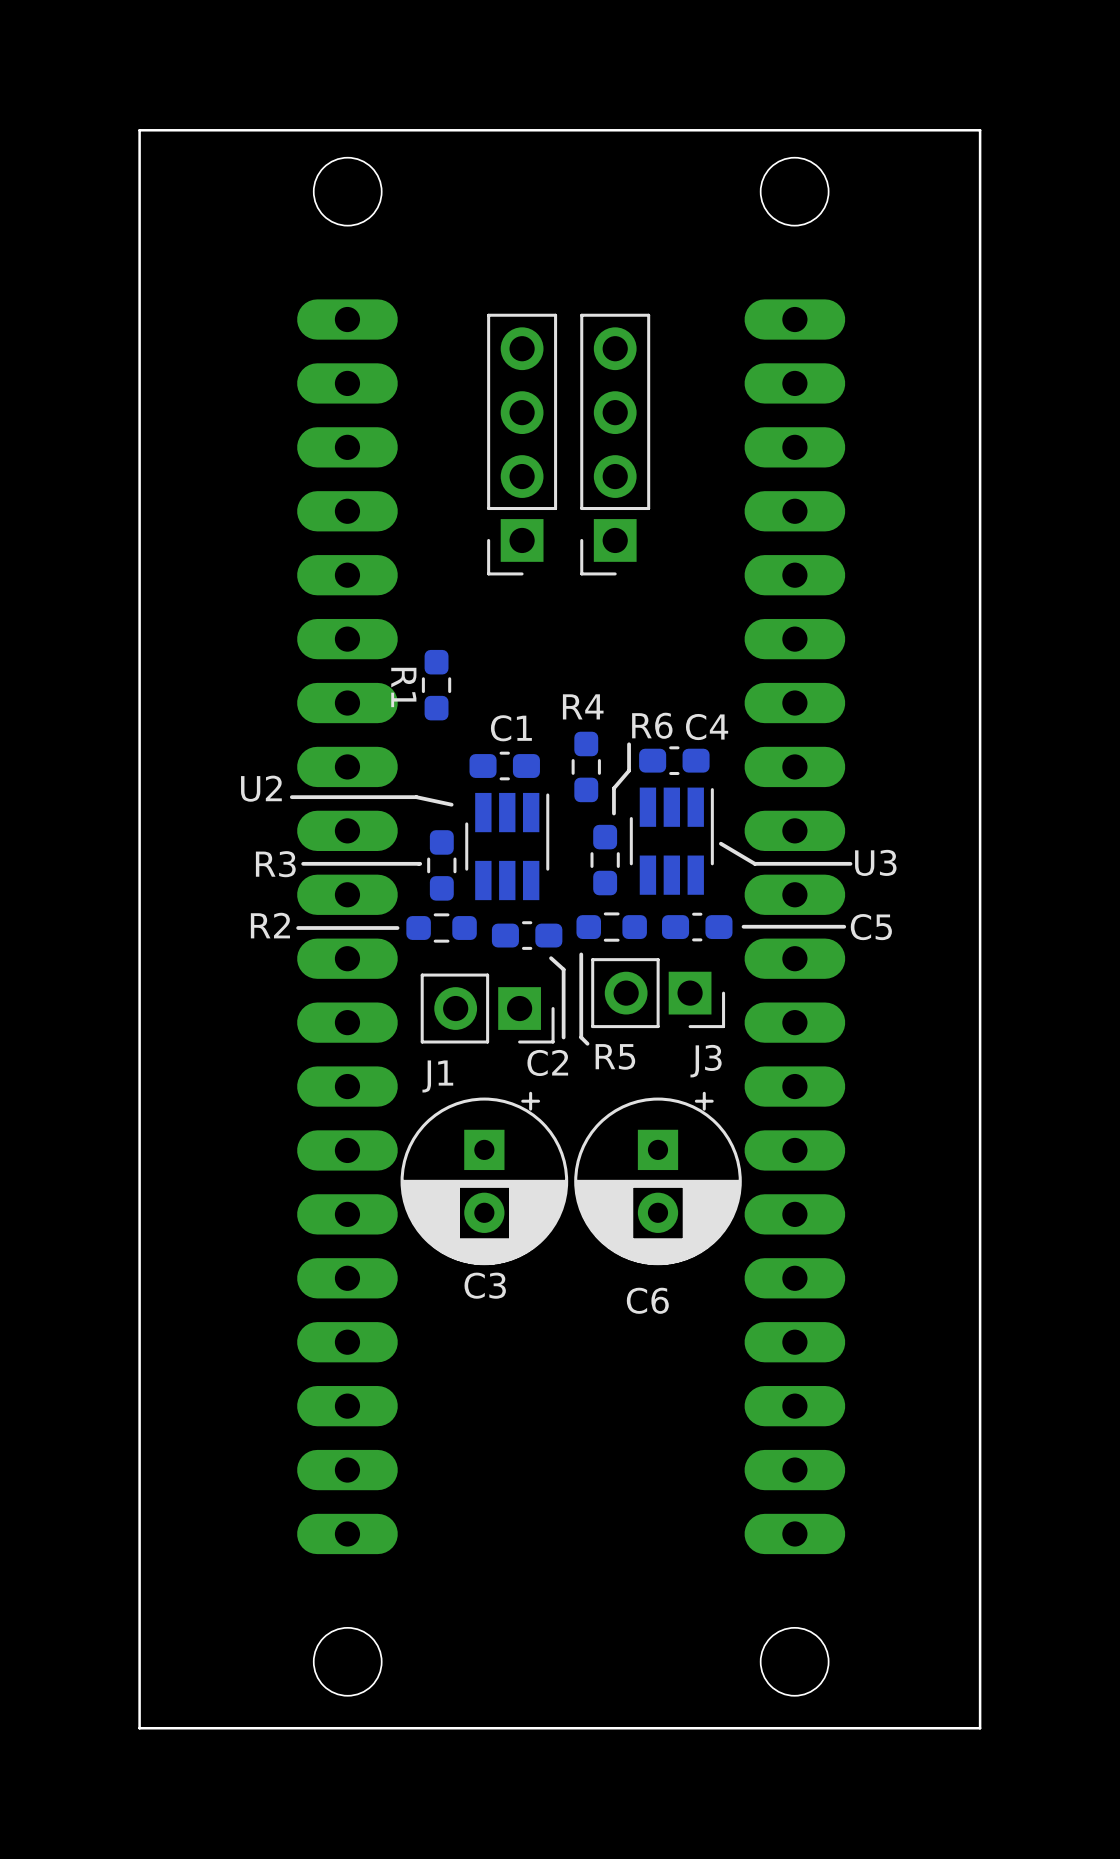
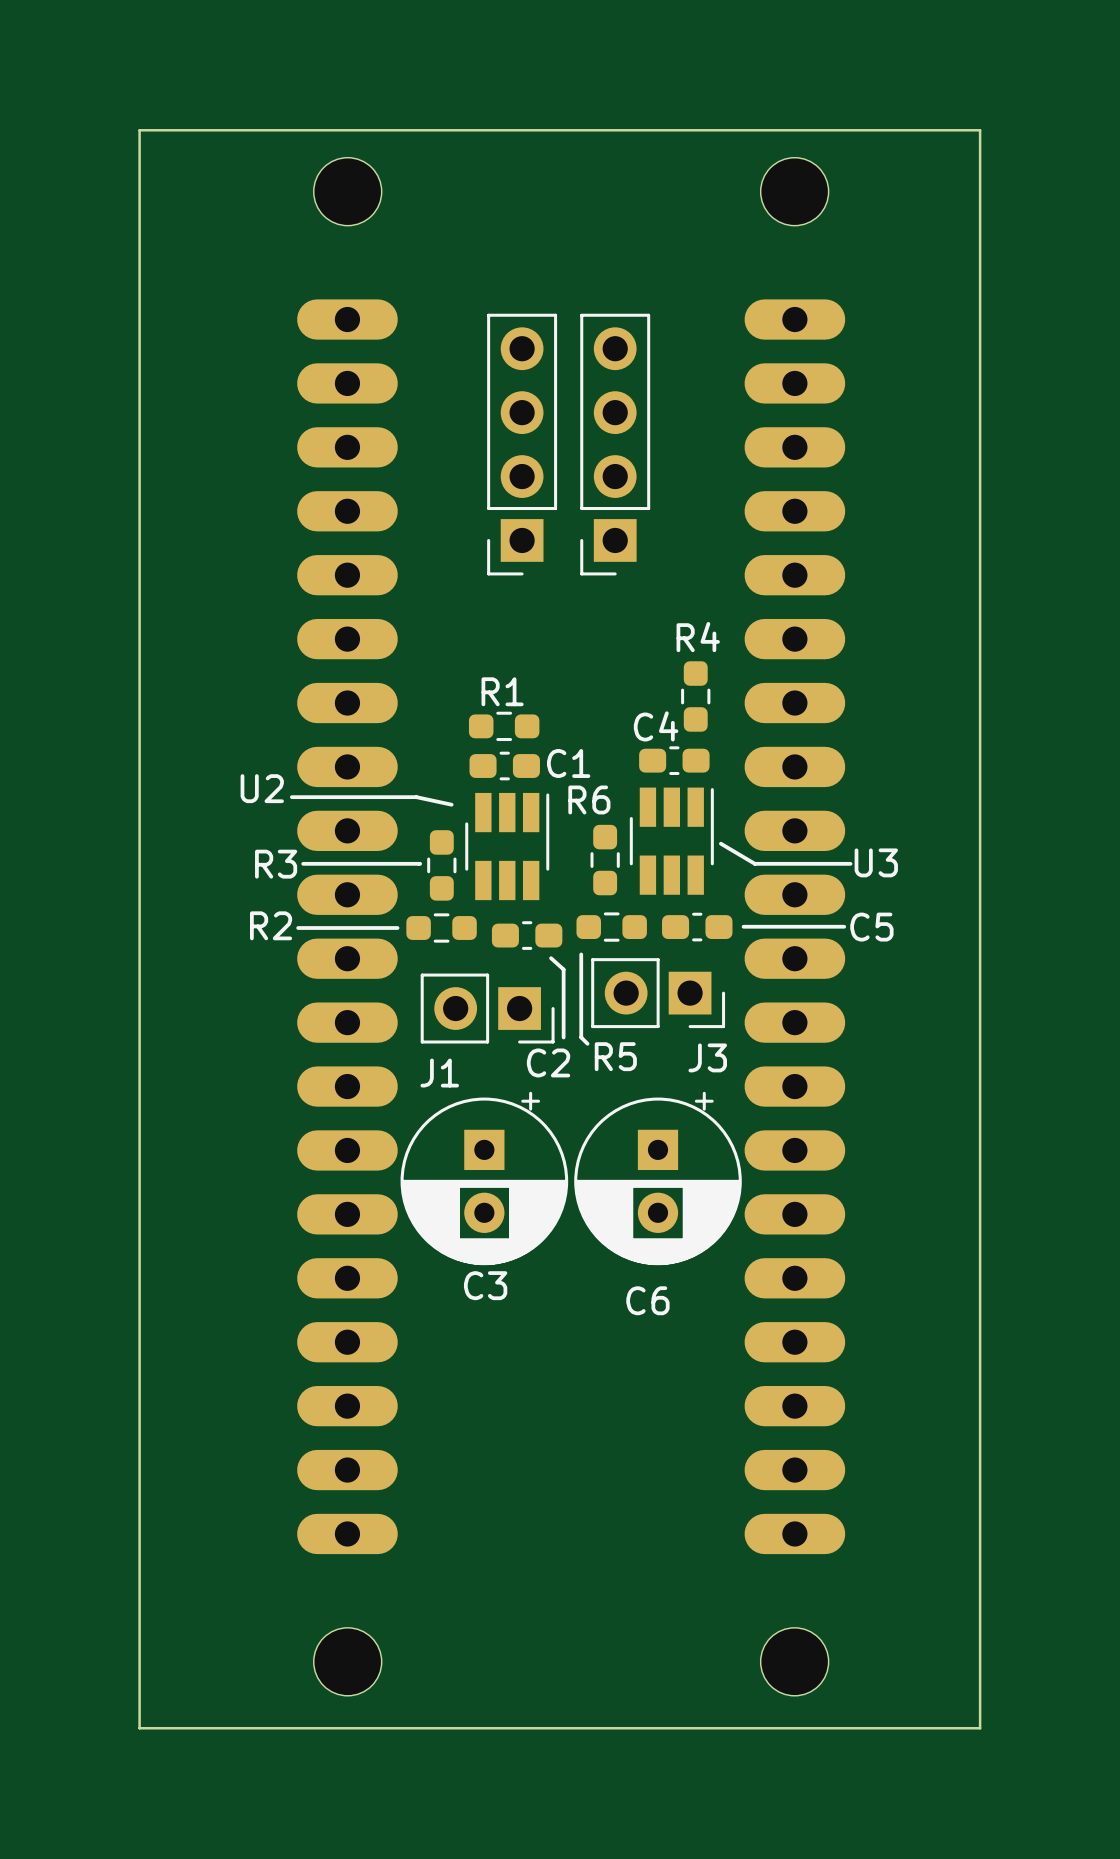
R1 rotation: 0° (436, 685) -> 90° clockwise (504, 726)
R1 position: (436, 685) -> (504, 726)
R4 name position: R4 (583, 706) -> R4 (698, 637)
R6 name position: R6 (652, 725) -> R6 (589, 799)
C4 name position: C4 (707, 727) -> C4 (656, 726)
C1 name position: C1 (511, 728) -> C1 (568, 763)
line: (629, 744) (629, 770) (613, 788) (613, 813) -> none
R4 position: (586, 766) -> (695, 696)

